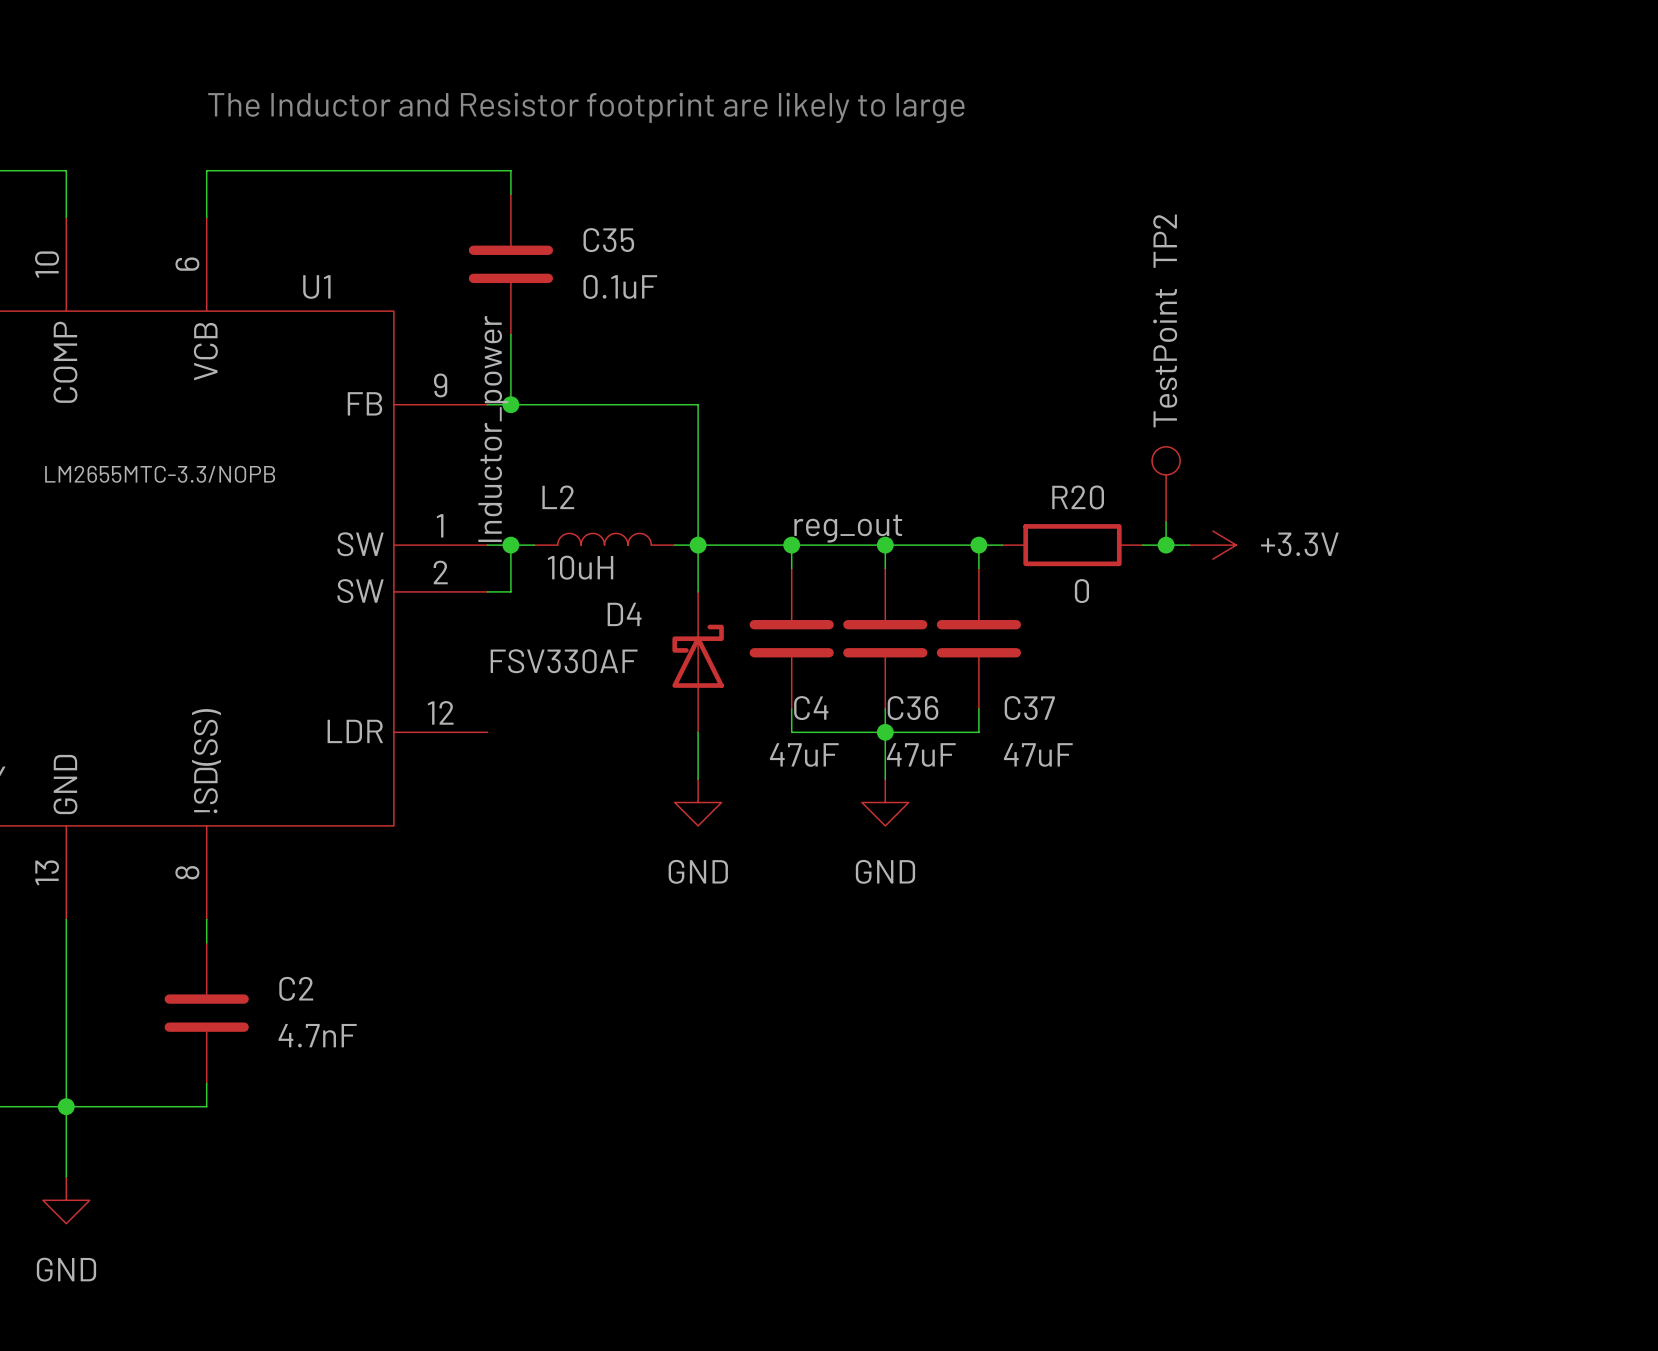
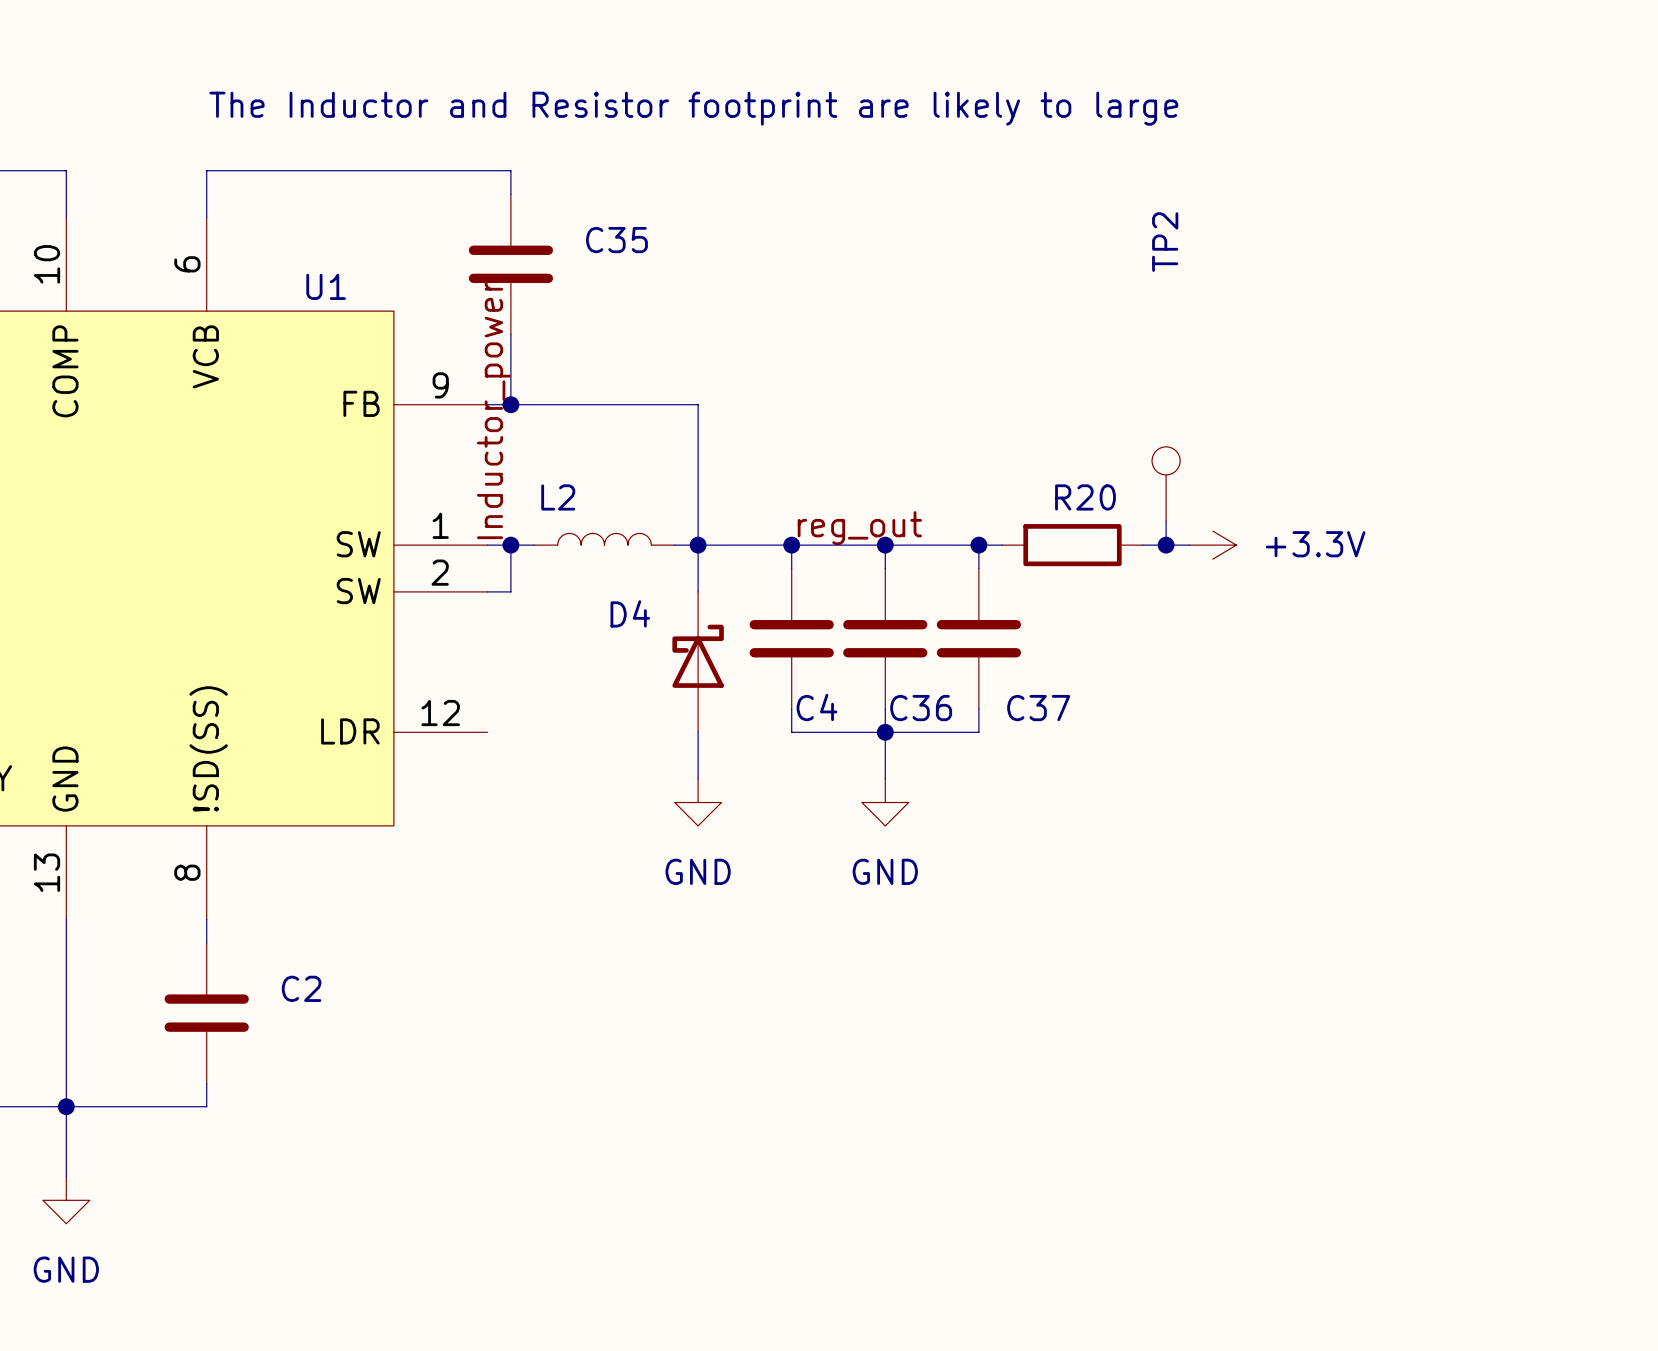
C35 value: 0.1uF (620, 286) -> none
TP2 value: TestPoint (1165, 358) -> none
U1 value: LM2655MTC-3.3/NOPB (160, 474) -> none
L2 value: 10uH (580, 567) -> none
R20 value: 0 (1081, 591) -> none
D4 value: FSV330AF (564, 661) -> none
C4 value: 47uF (804, 754) -> none
C36 value: 47uF (921, 754) -> none
C37 value: 47uF (1038, 754) -> none
C2 value: 4.7nF (317, 1035) -> none

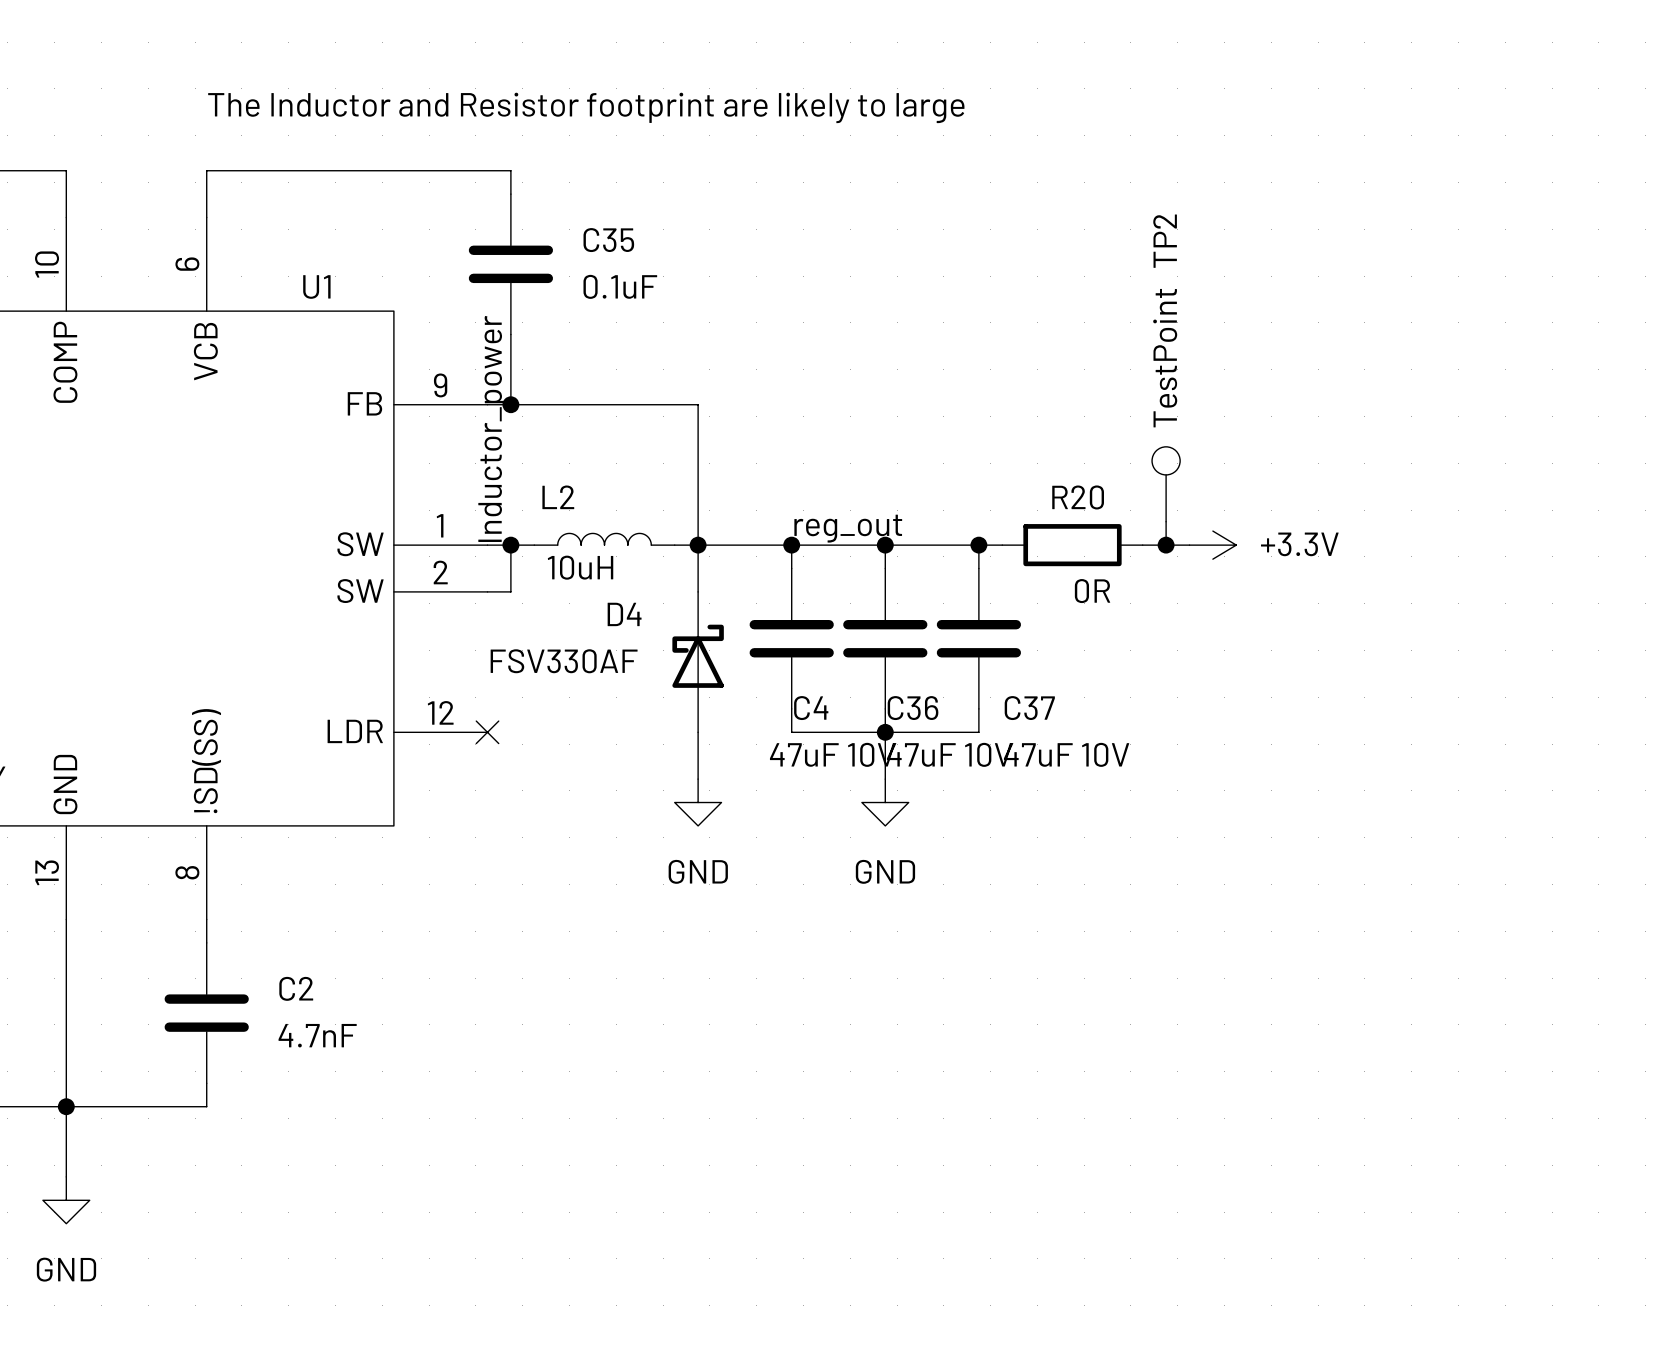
C35 value: none -> 0.1uF (620, 286)
TP2 value: none -> TestPoint (1165, 358)
L2 value: none -> 10uH (580, 567)
R20 value: none -> 0R (1092, 591)
D4 value: none -> FSV330AF (564, 661)
no-connect mark: none -> (487, 732)
C4 value: none -> 47uF 10V (832, 754)
C36 value: none -> 47uF 10V (949, 754)
C37 value: none -> 47uF 10V (1066, 754)
C2 value: none -> 4.7nF (317, 1035)

